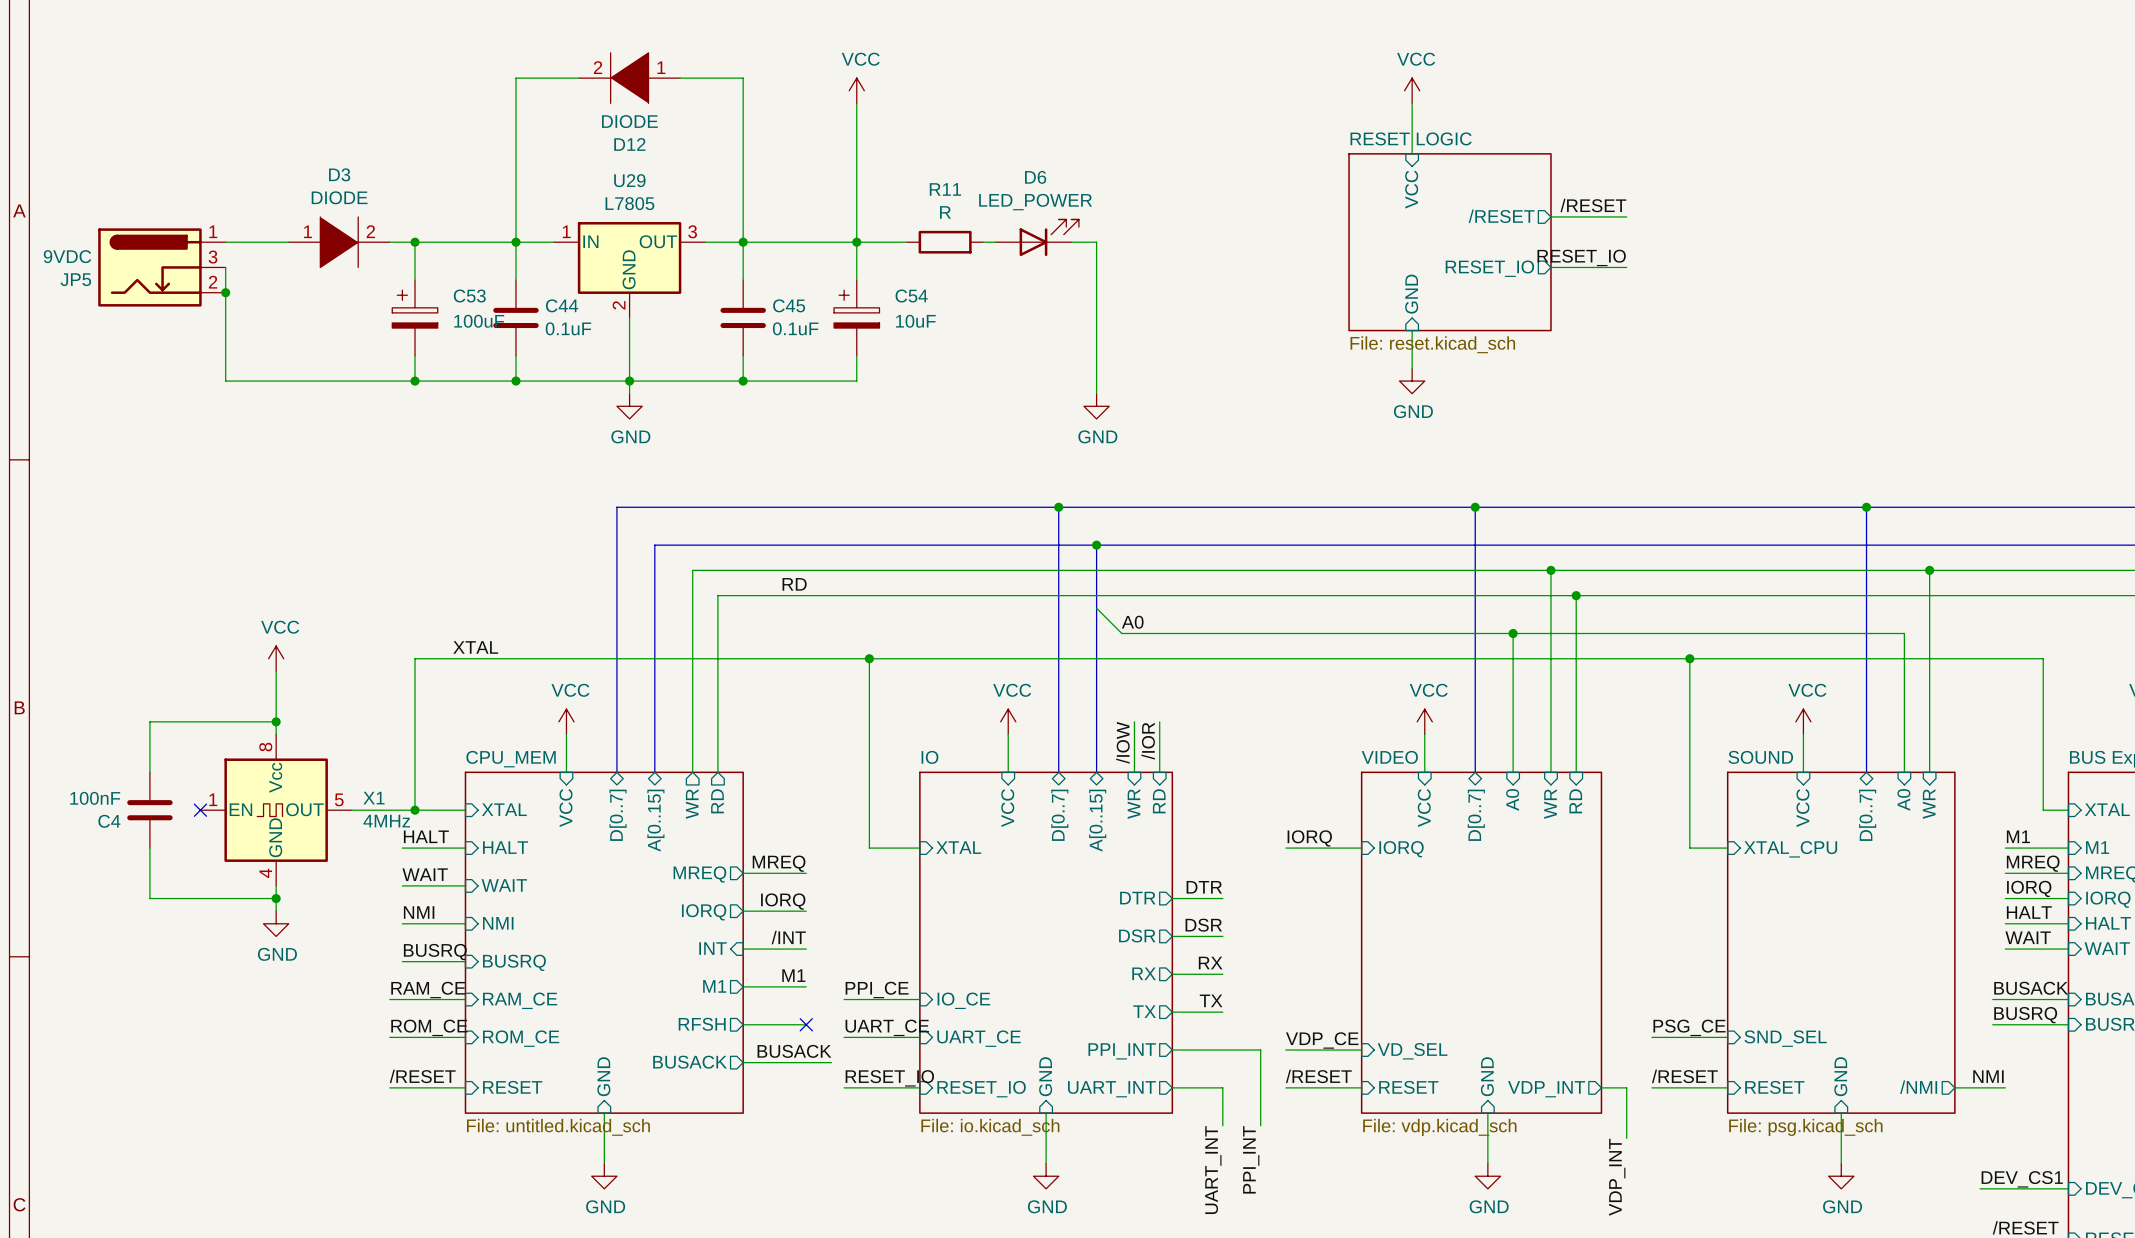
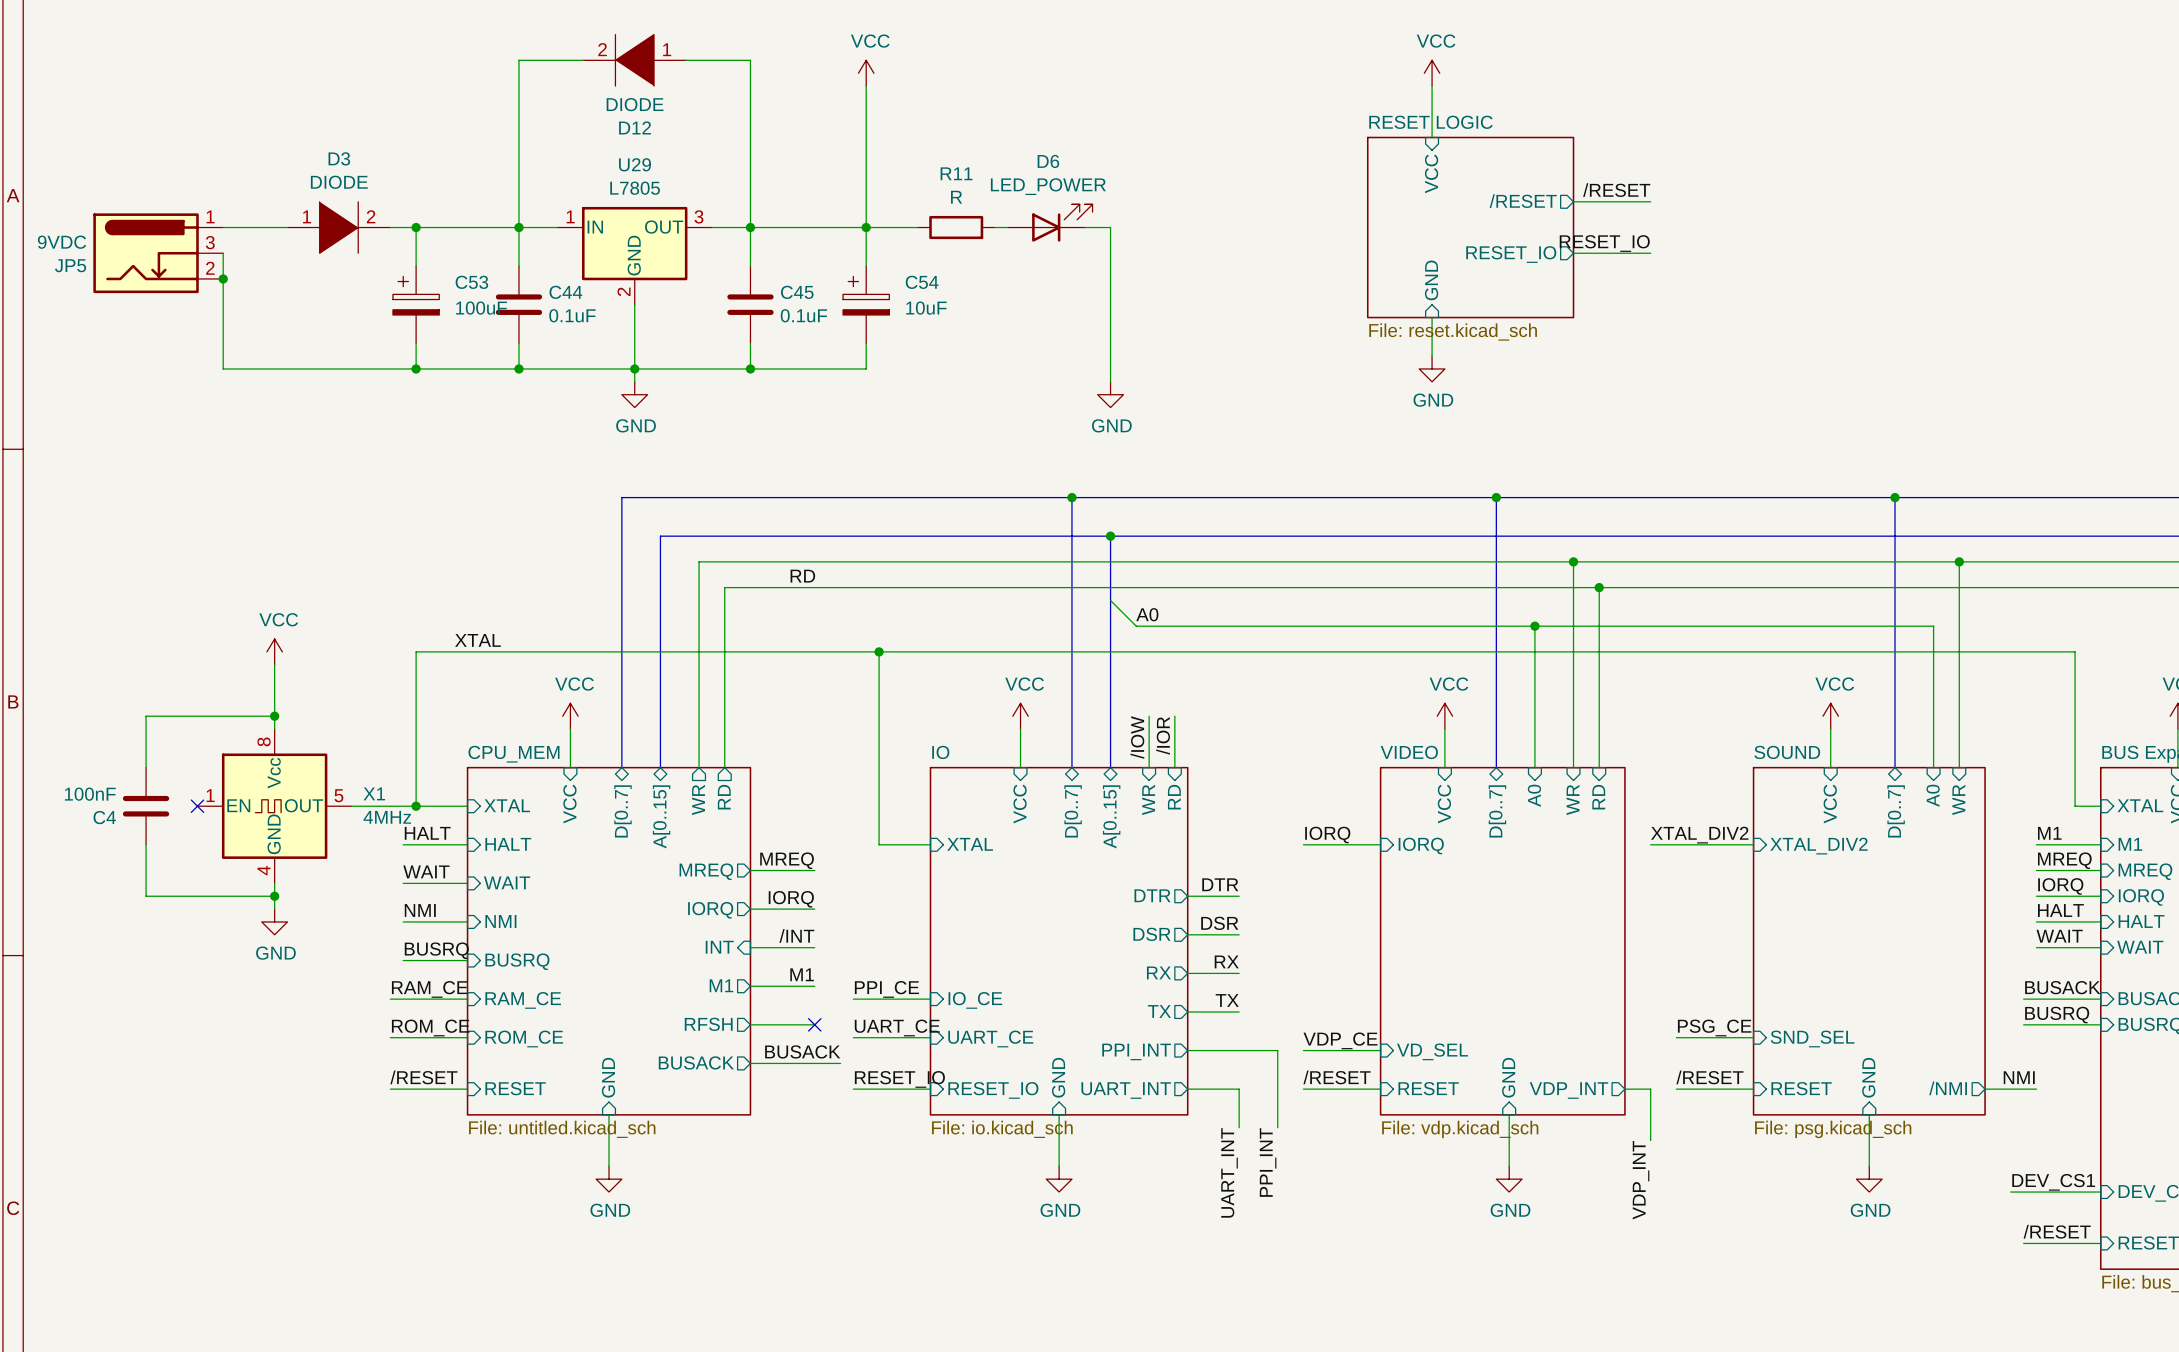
wire: (1689, 658) (1689, 848) -> (1650, 844) (1714, 844)
junction: (1689, 658) -> none
label: none -> XTAL_DIV2 (1699, 835)
sheet pin: XTAL_CPU (1790, 849) -> XTAL_DIV2 (1818, 846)

